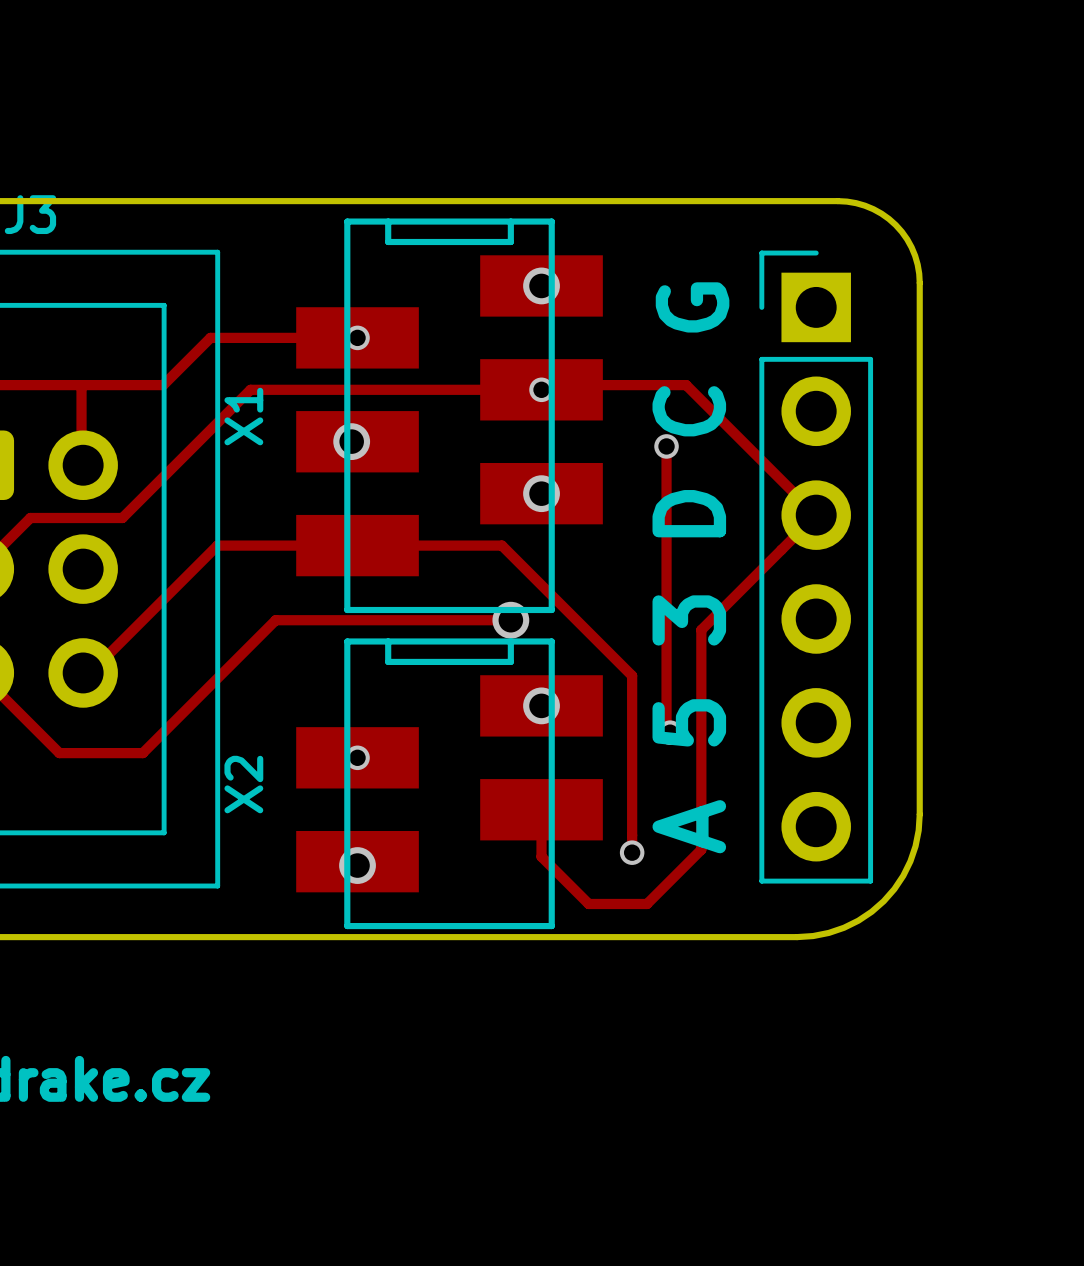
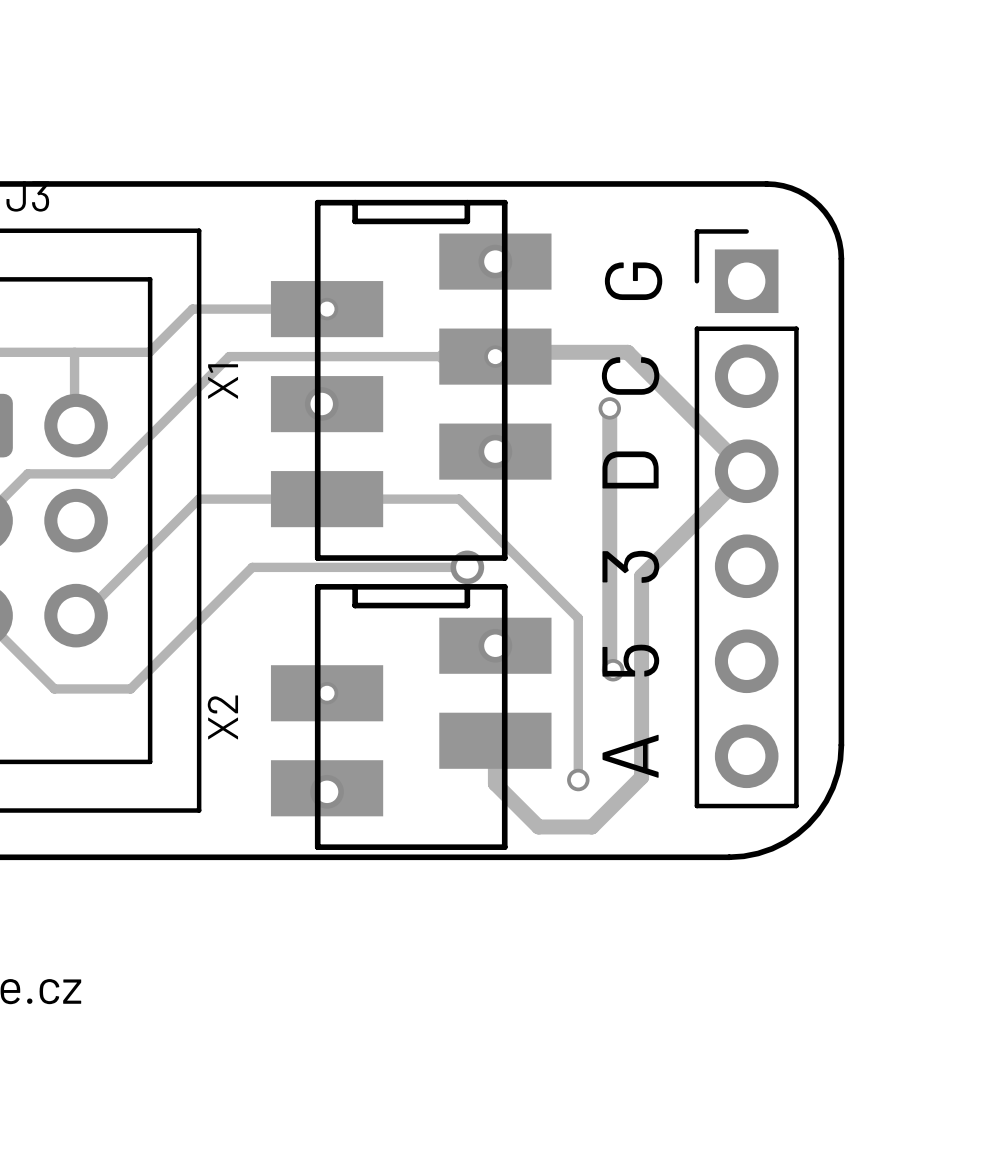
track width: thin (484, 389) (541, 389) (546, 385) (686, 385) (816, 515) (701, 630) (701, 849) (647, 903) (588, 903) (541, 856) (541, 809) -> thick (443, 356) (495, 356) (499, 352) (627, 352) (746, 471) (641, 576) (641, 777) (591, 826) (538, 826) (495, 783) (495, 740)
track width: thin (666, 446) (666, 729) (670, 732) -> thick (609, 408) (609, 666) (613, 670)

